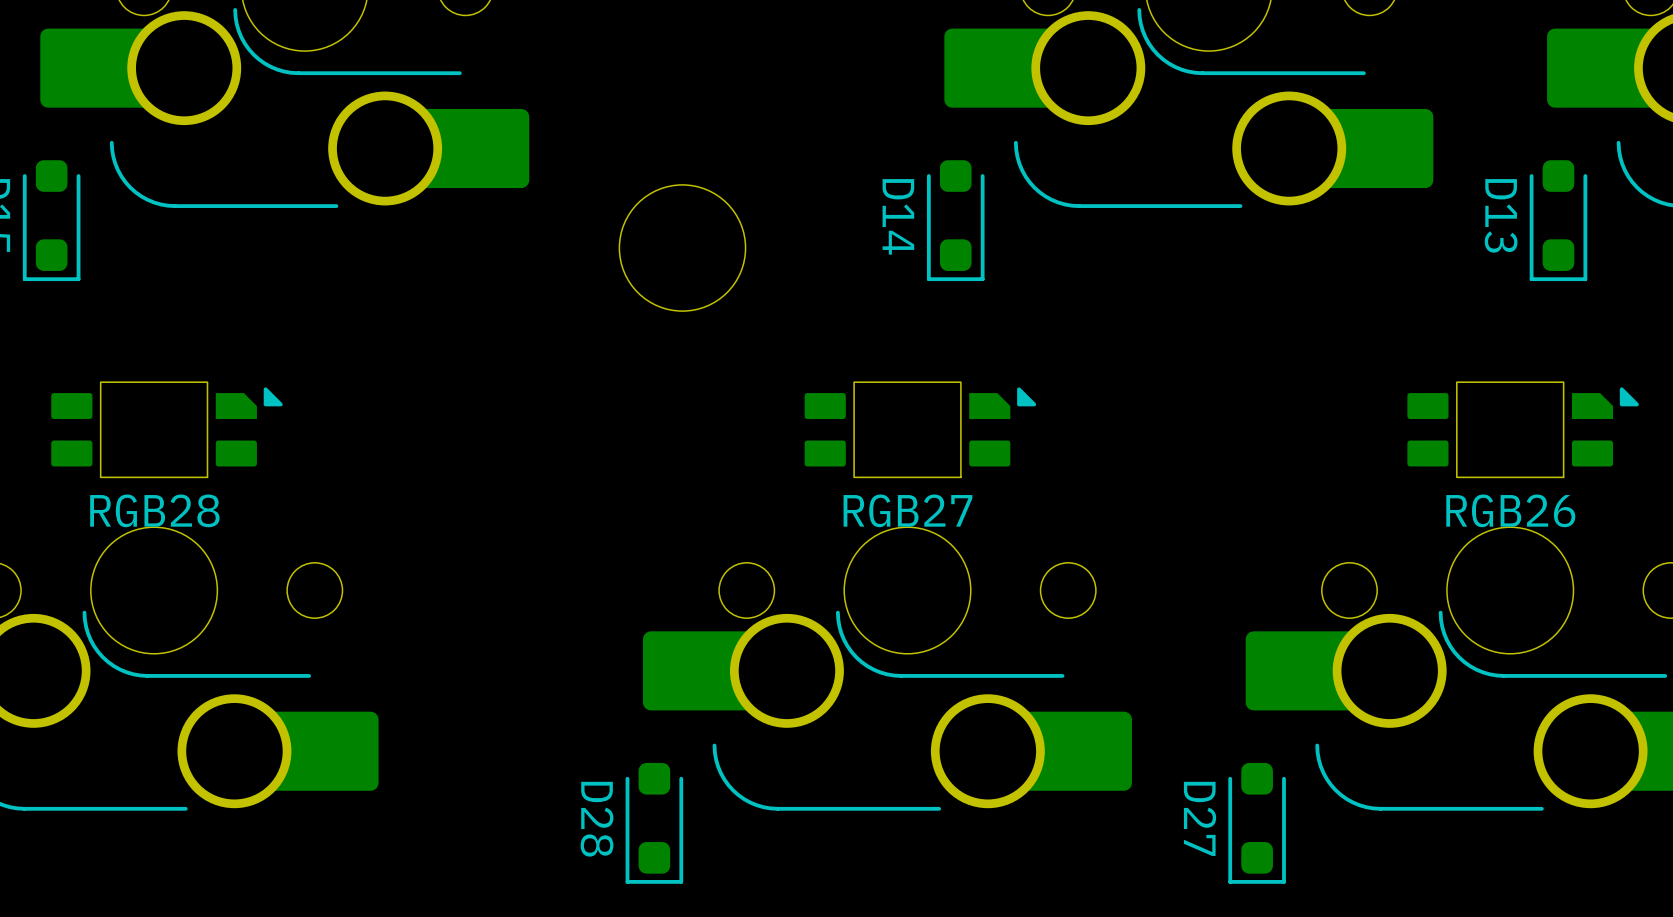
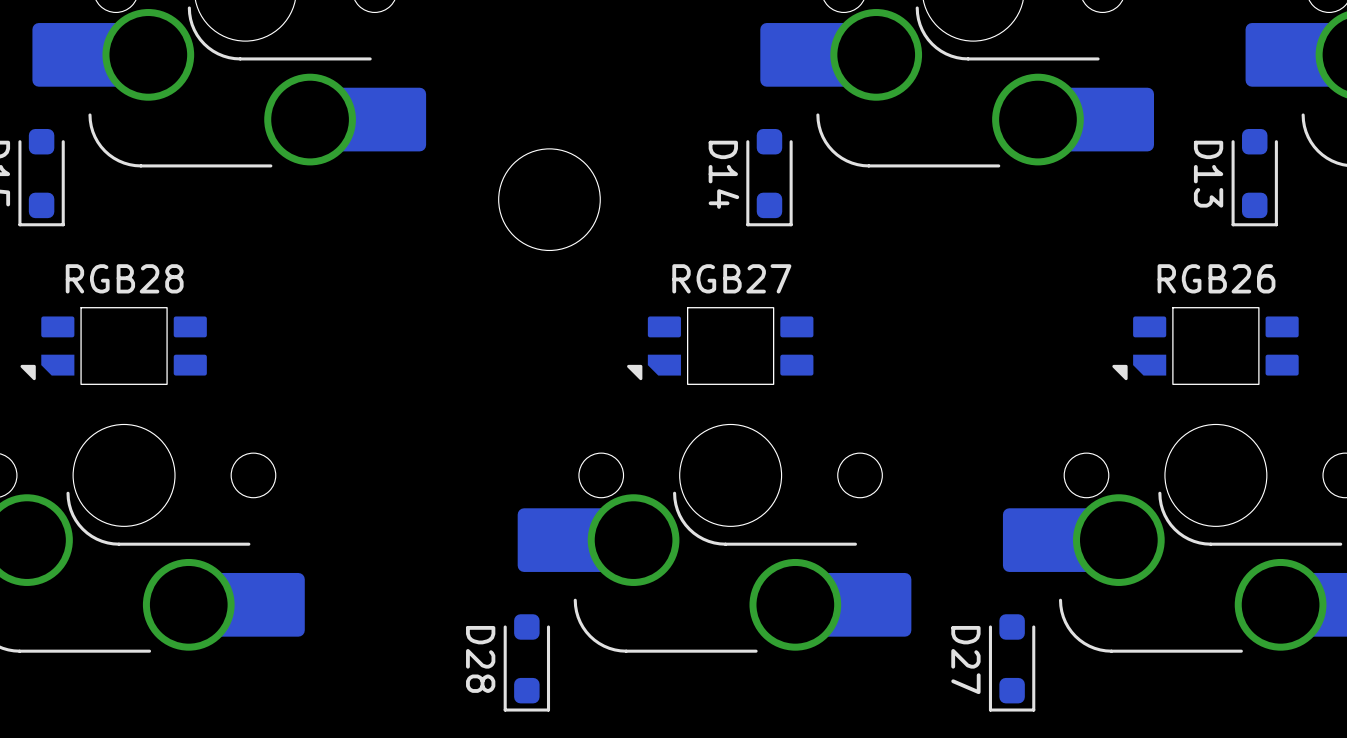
RGB28 rotation: 0° (166, 429) -> 180° (113, 346)
RGB27 rotation: 0° (920, 429) -> 180° (720, 346)
RGB26 rotation: 0° (1523, 429) -> 180° (1205, 346)

